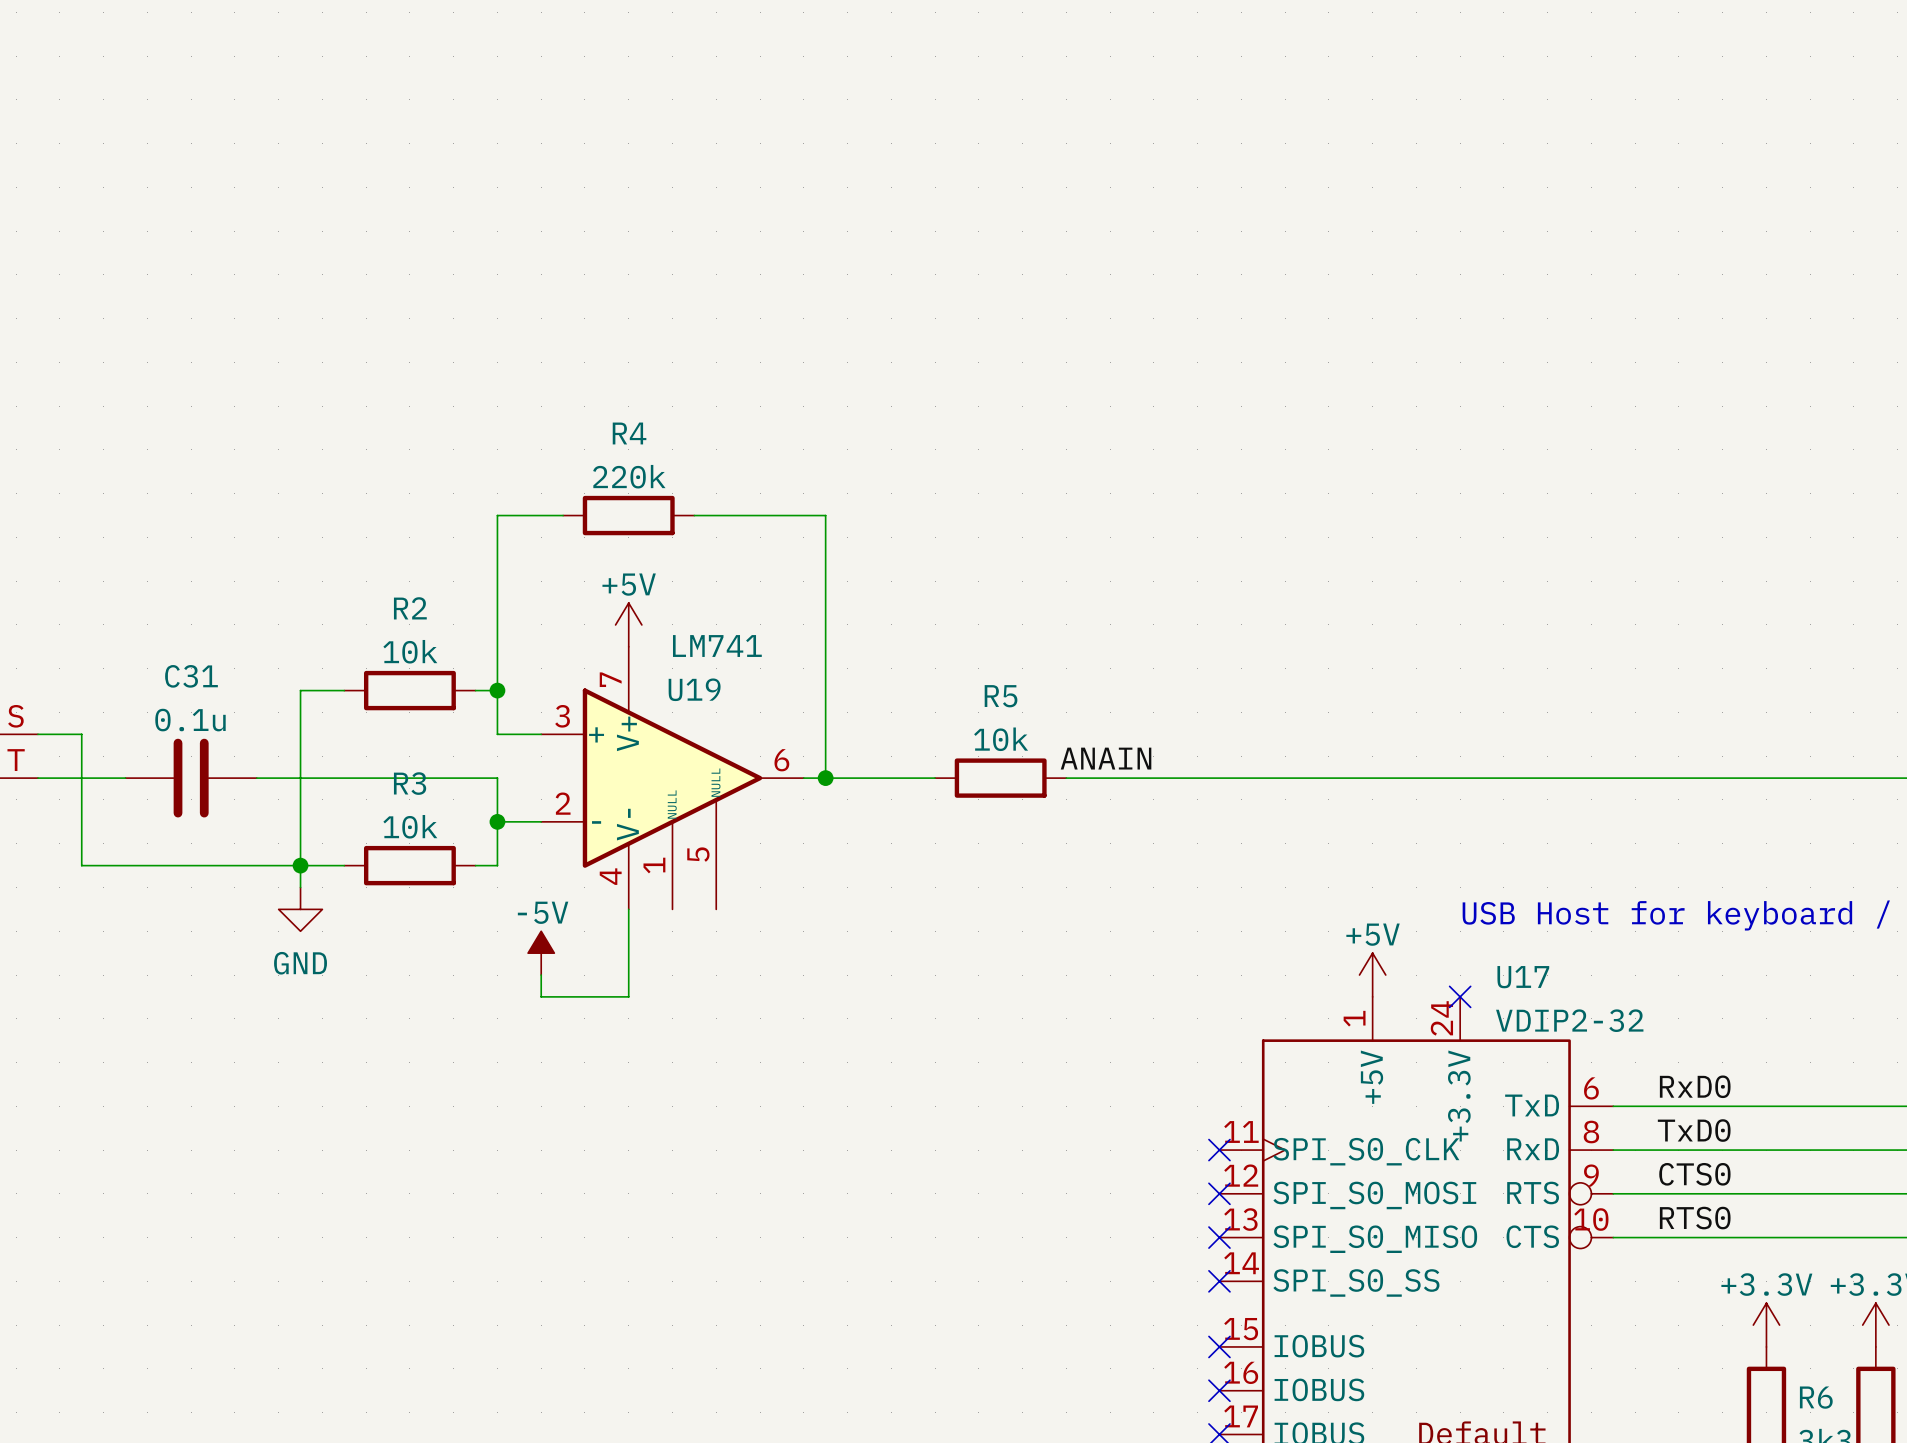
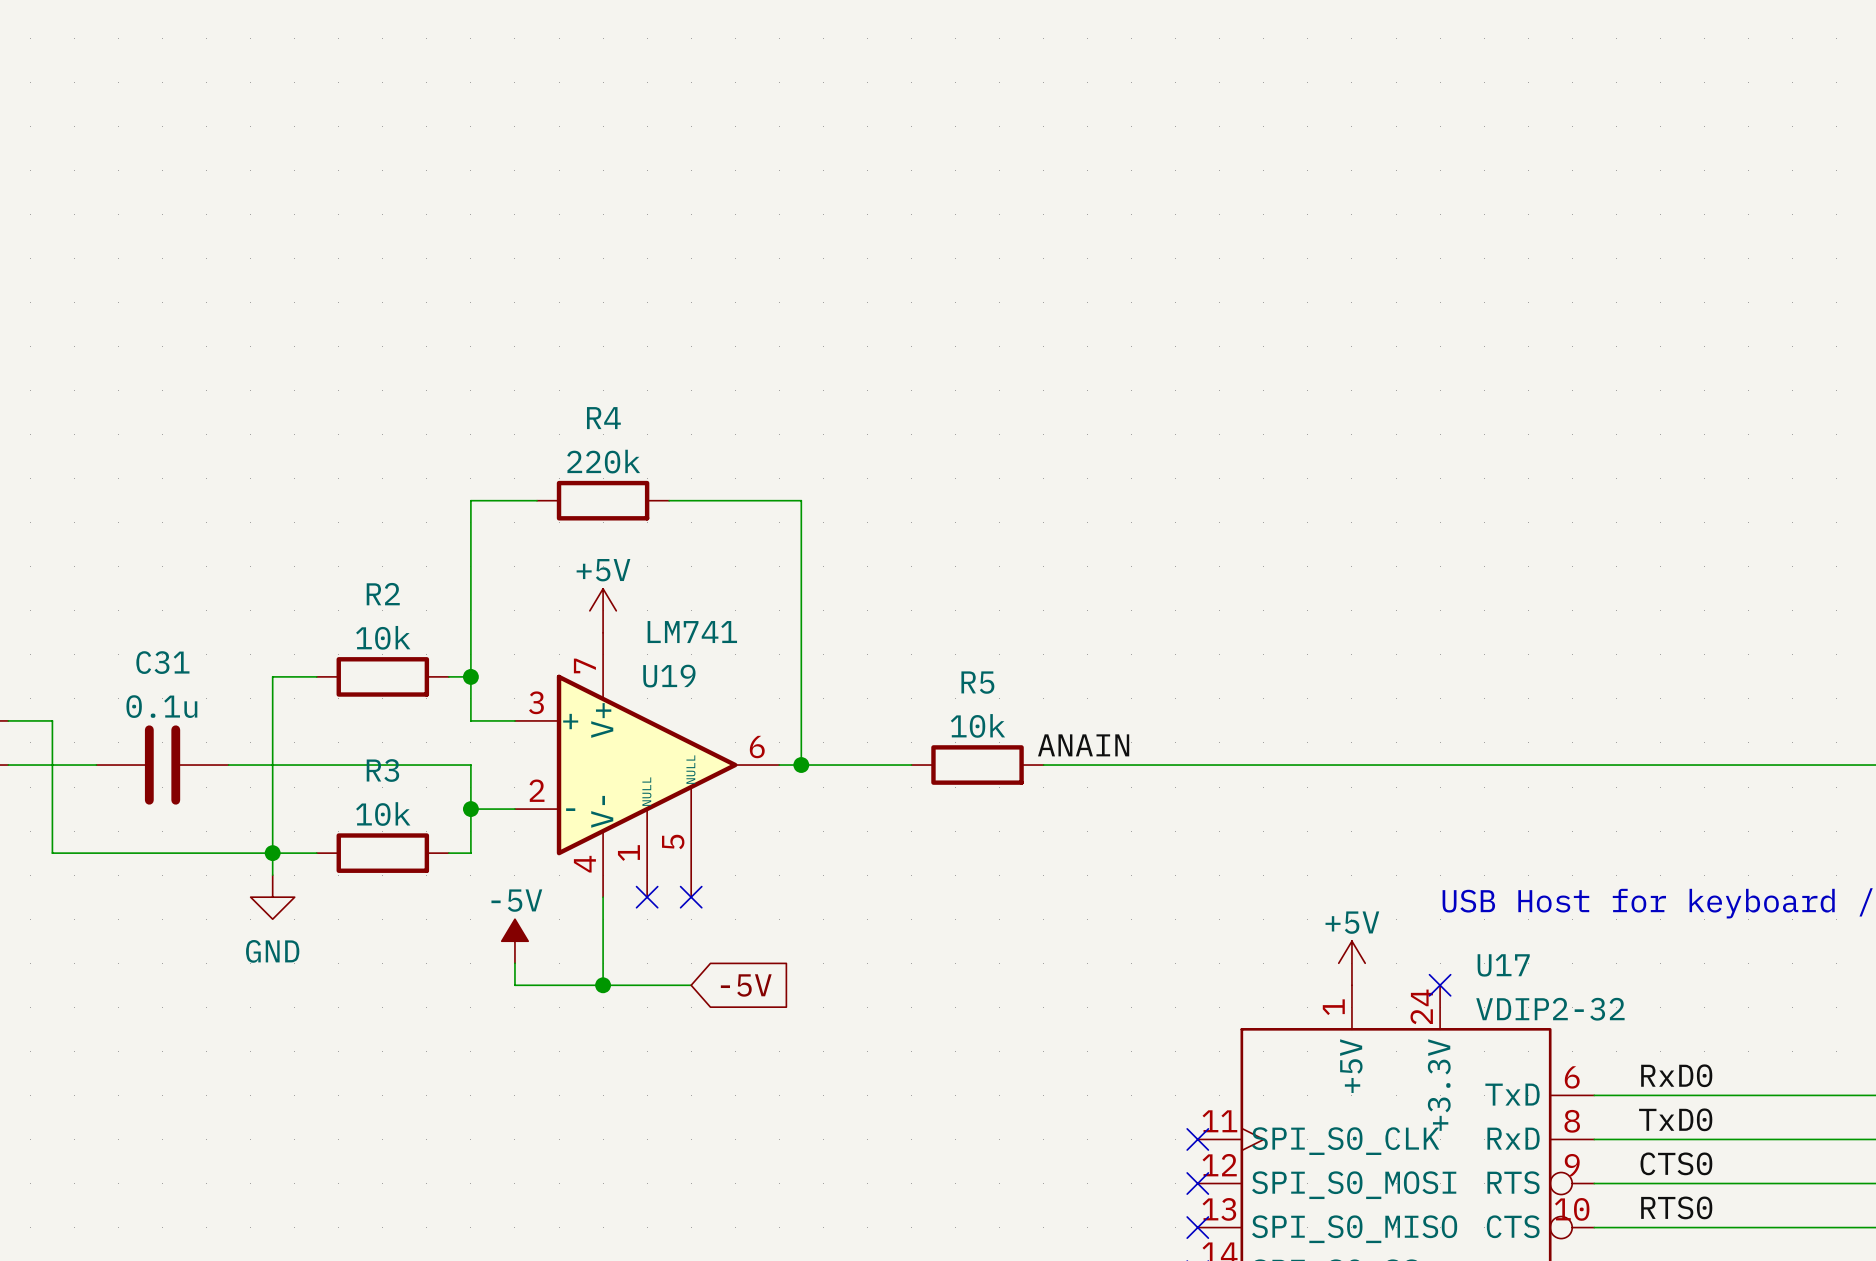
no-connect mark: none -> (647, 897)
no-connect mark: none -> (691, 897)
wire: none -> (603, 985) (691, 985)
junction: none -> (603, 985)
global label: none -> -5V (746, 985)

